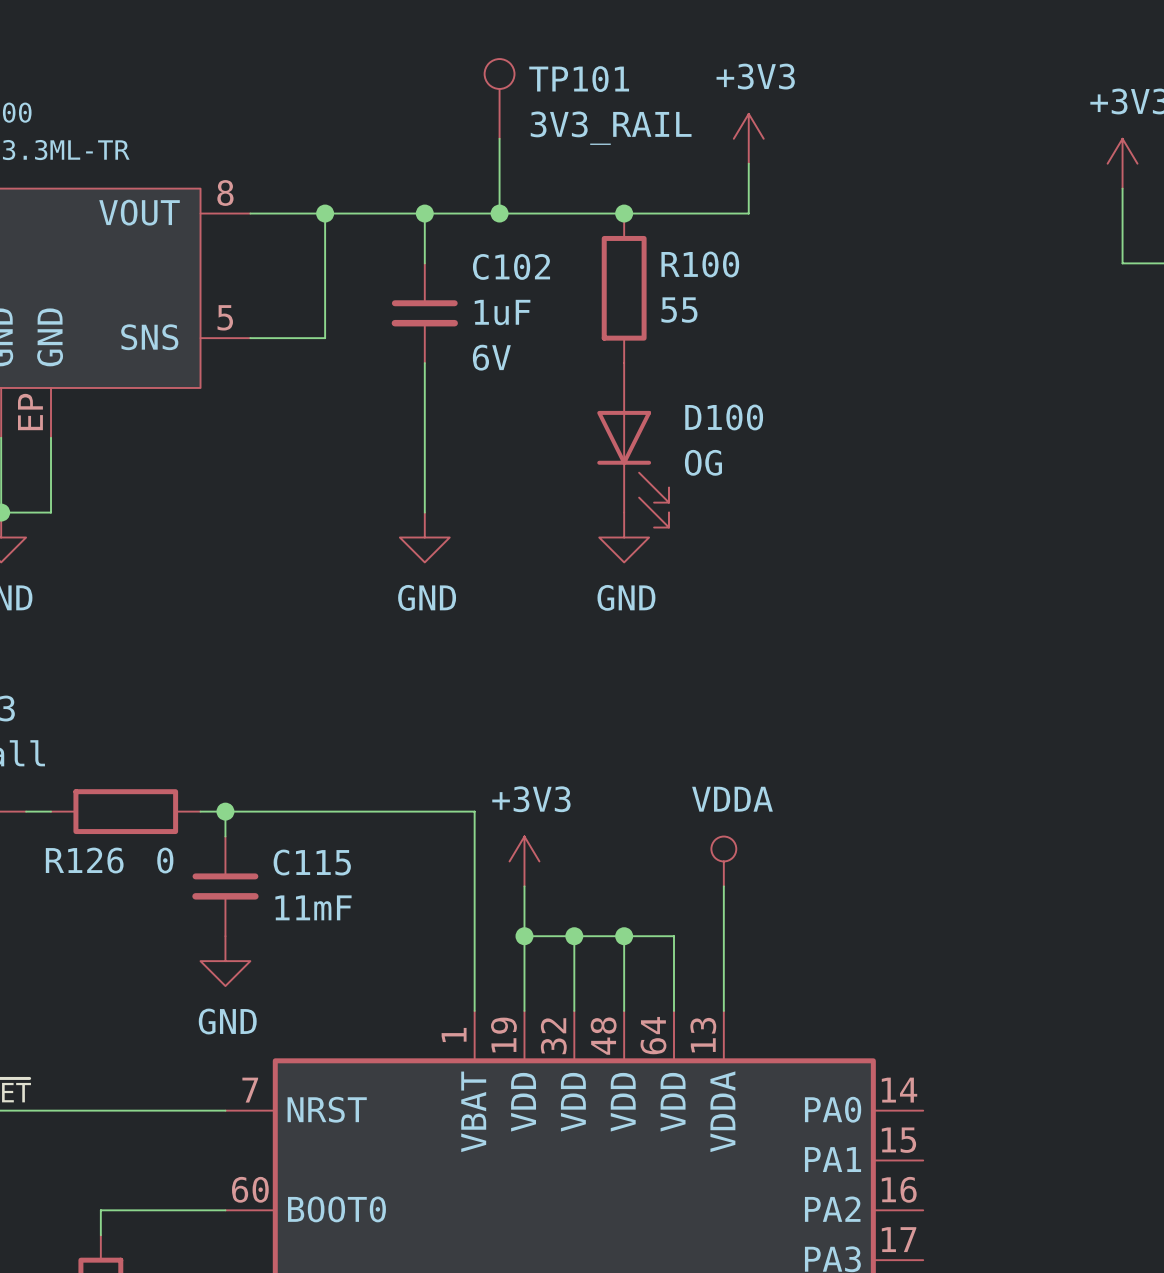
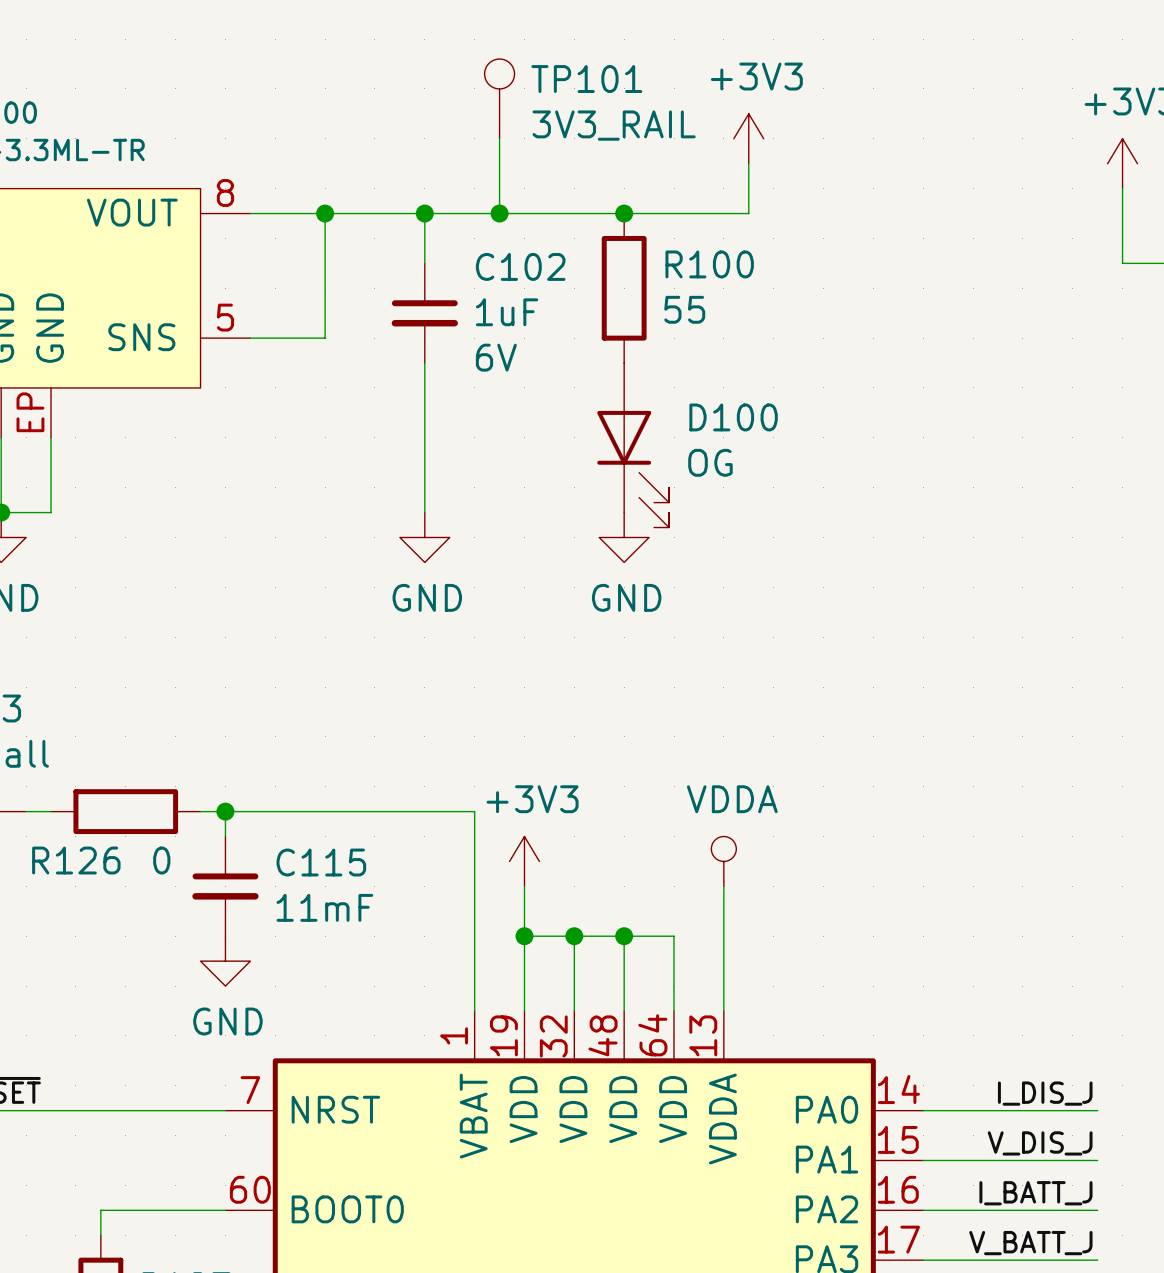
label: none -> I_DIS_J (1045, 1093)
wire: none -> (923, 1110) (1097, 1110)
label: none -> V_DIS_J (1040, 1143)
wire: none -> (923, 1160) (1097, 1160)
label: none -> I_BATT_J (1035, 1193)
wire: none -> (923, 1210) (1097, 1210)
label: none -> V_BATT_J (1030, 1243)
wire: none -> (923, 1260) (1097, 1260)

